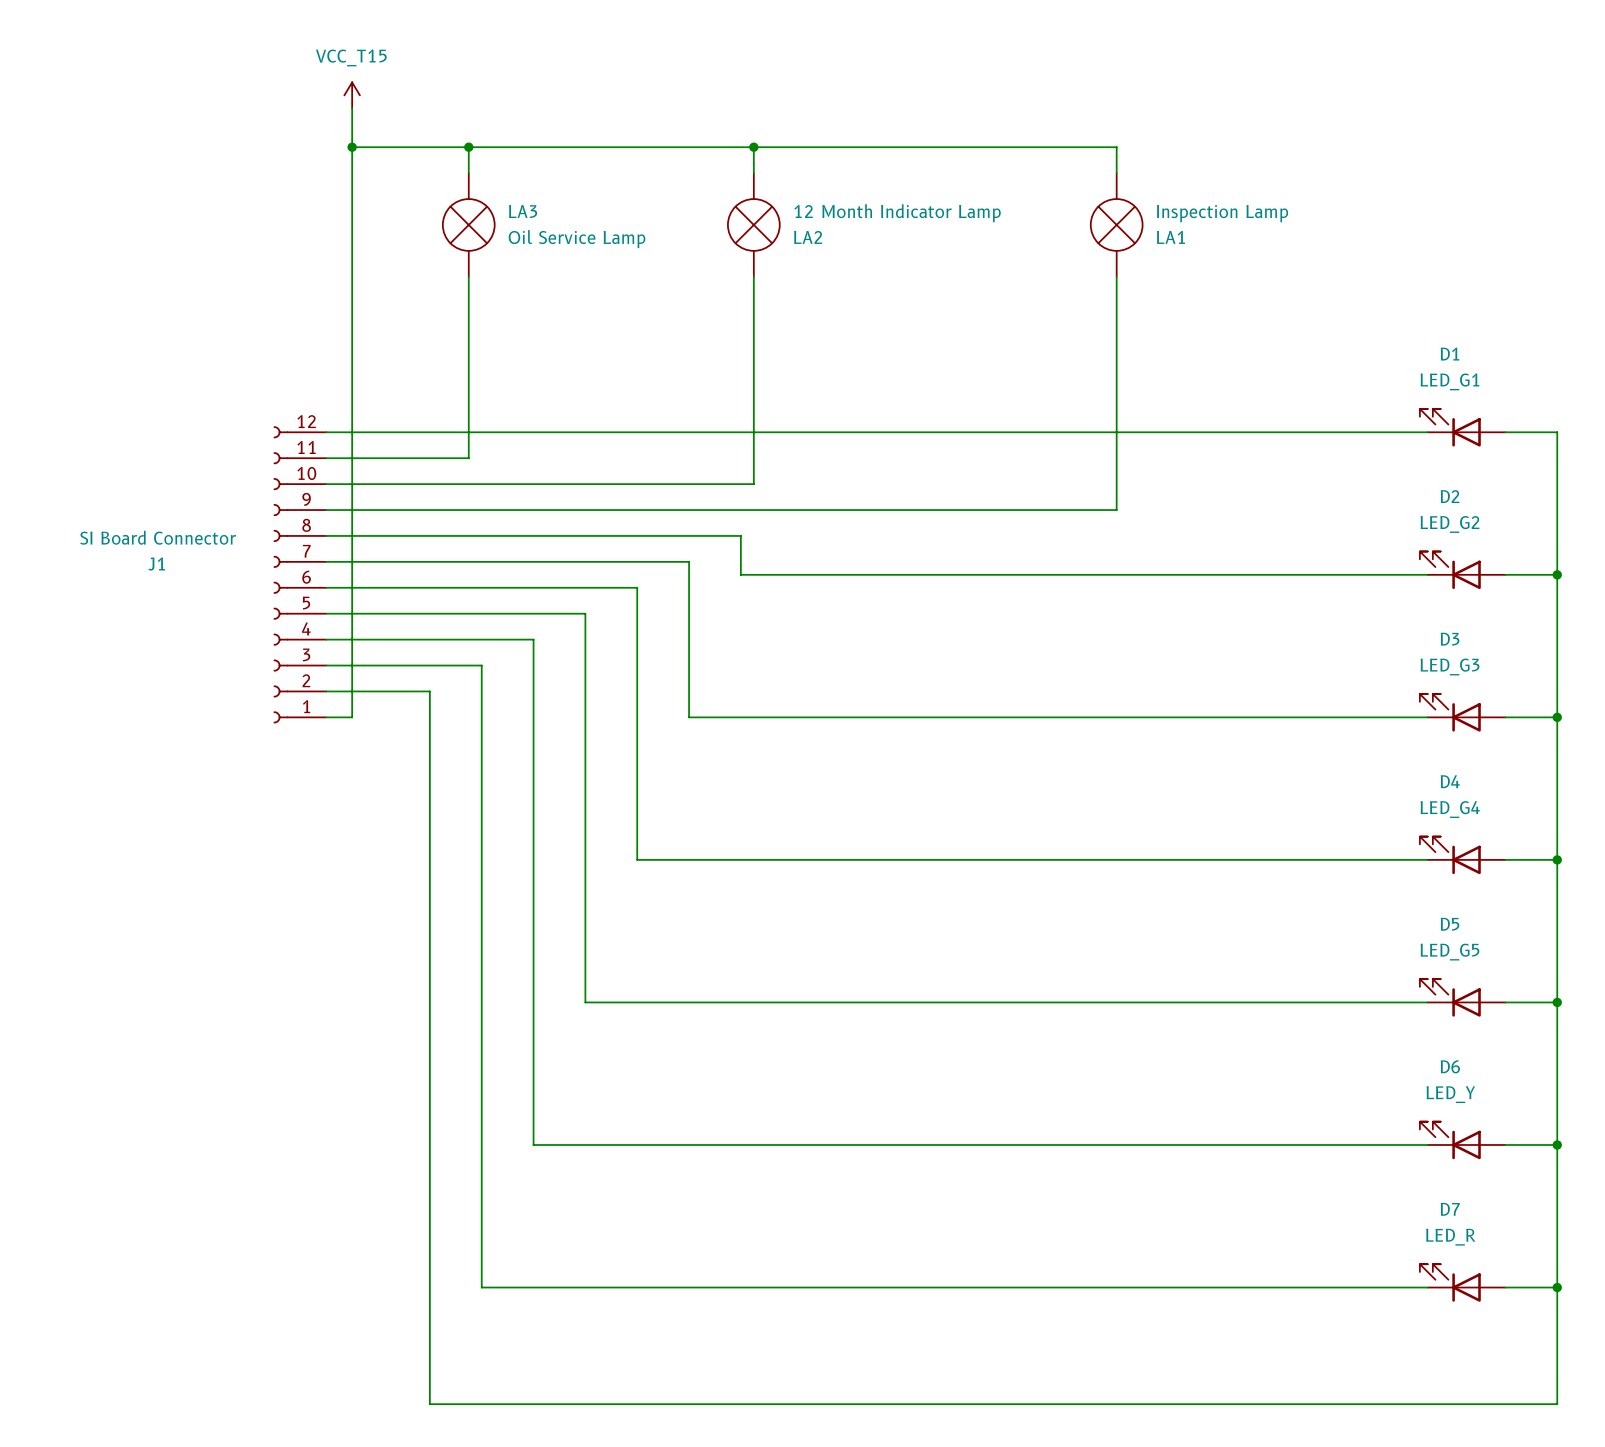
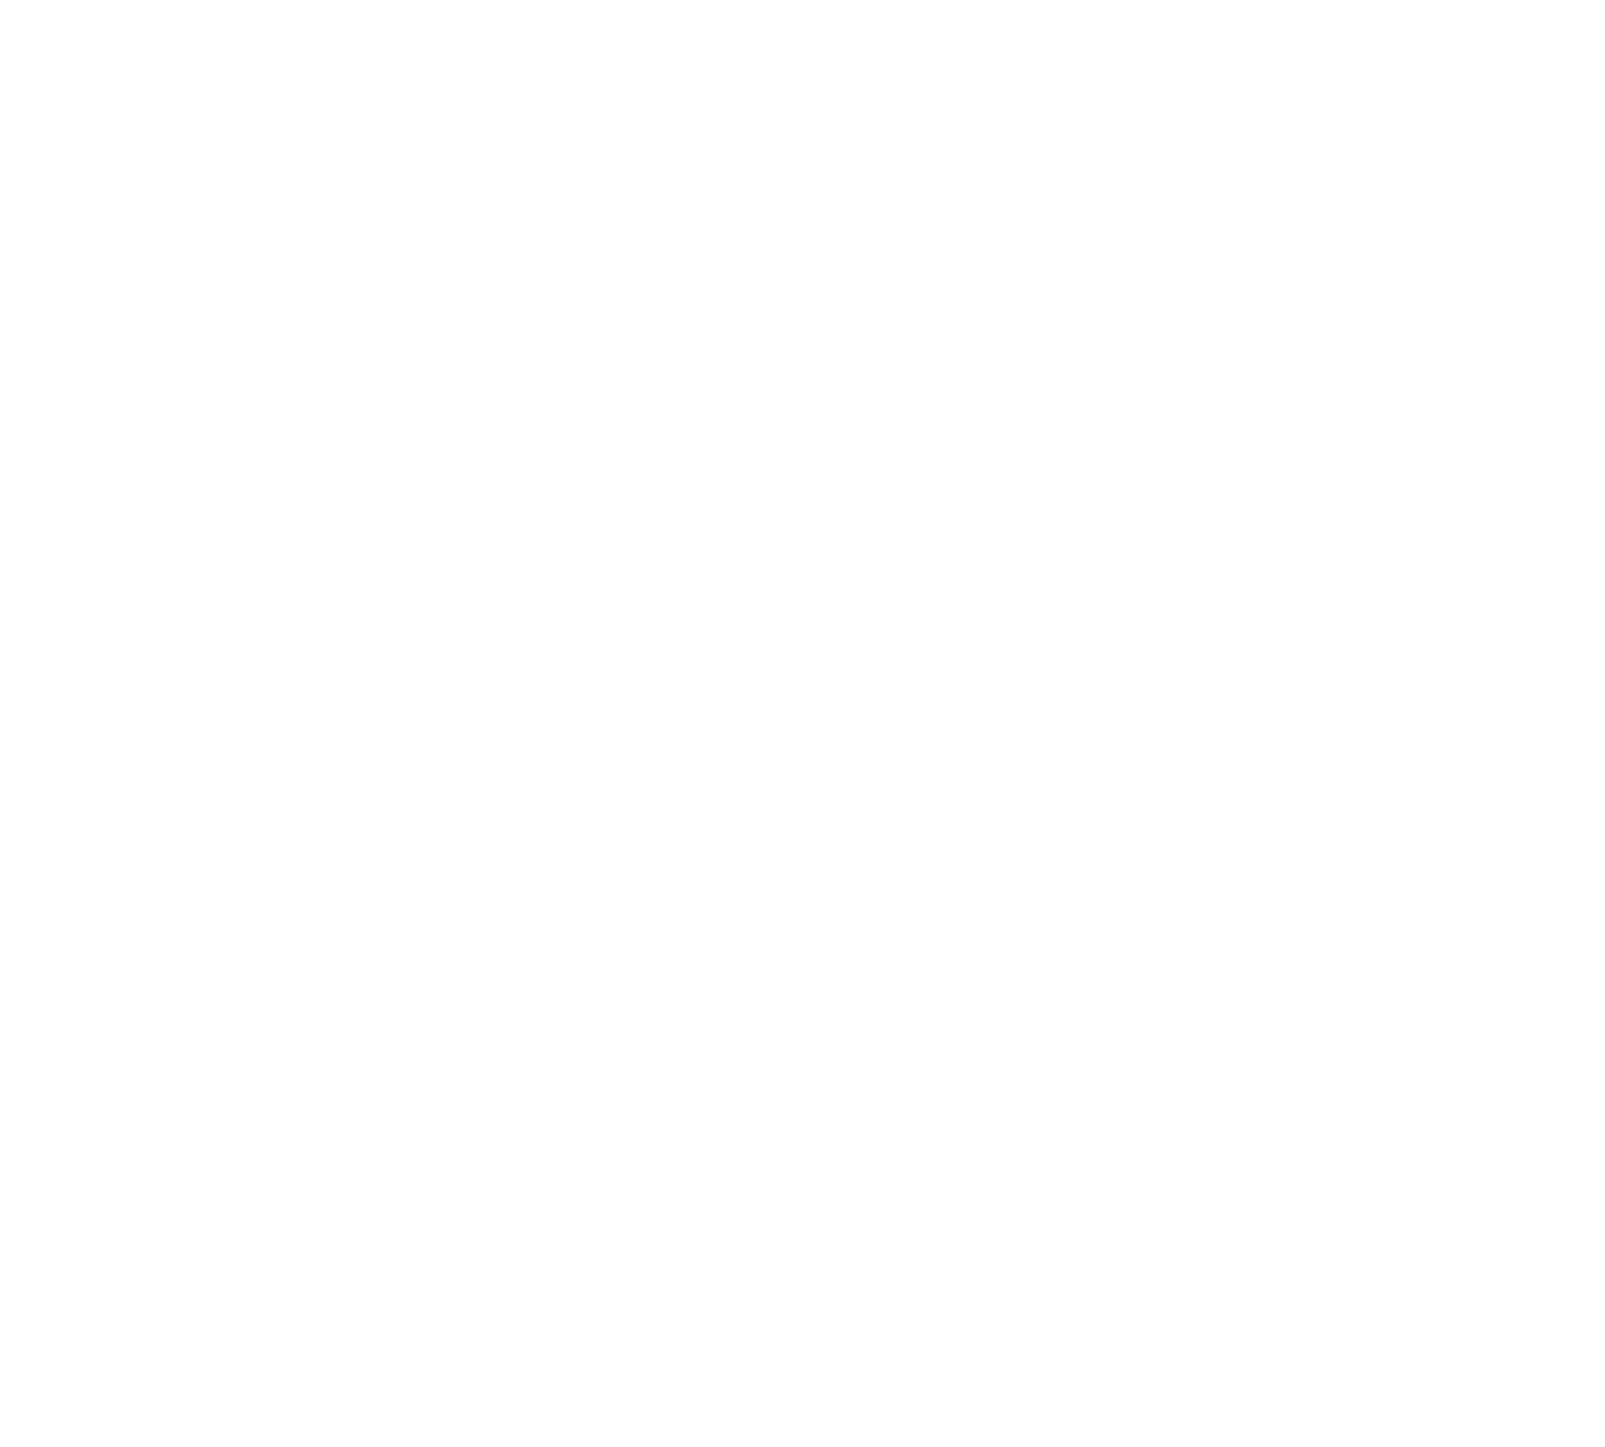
power symbol: VCC_T15 (352, 95) -> none
wire: (352, 108) (352, 717) (326, 717) -> none
wire: (352, 147) (1116, 147) (1116, 173) -> none
junction: (352, 147) -> none
wire: (468, 147) (468, 173) -> none
junction: (468, 147) -> none
wire: (753, 147) (753, 173) -> none
junction: (753, 147) -> none
LA3: Oil Service Lamp (468, 224) -> none
LA2: 12 Month Indicator Lamp (753, 224) -> none
LA1: Inspection Lamp (1116, 224) -> none
wire: (468, 276) (468, 458) (326, 458) -> none
wire: (753, 276) (753, 484) (326, 484) -> none
wire: (1116, 276) (1116, 510) (326, 510) -> none
D1: LED_G1 (1462, 427) -> none
wire: (326, 432) (1427, 432) -> none
wire: (1505, 432) (1557, 432) (1557, 1404) (429, 1404) (429, 691) (326, 691) -> none
wire: (326, 535) (740, 535) (740, 574) (1427, 574) -> none
wire: (326, 561) (689, 561) (689, 717) (1427, 717) -> none
D2: LED_G2 (1462, 570) -> none
J1: SI Board Connector (299, 574) -> none
wire: (1505, 574) (1557, 574) -> none
junction: (1557, 574) -> none
wire: (326, 587) (637, 587) (637, 859) (1427, 859) -> none
wire: (326, 613) (585, 613) (585, 1002) (1427, 1002) -> none
wire: (326, 639) (533, 639) (533, 1144) (1427, 1144) -> none
wire: (326, 665) (481, 665) (481, 1287) (1427, 1287) -> none
D3: LED_G3 (1462, 712) -> none
wire: (1505, 717) (1557, 717) -> none
junction: (1557, 717) -> none
D4: LED_G4 (1462, 855) -> none
wire: (1505, 859) (1557, 859) -> none
junction: (1557, 859) -> none
D5: LED_G5 (1462, 997) -> none
wire: (1505, 1002) (1557, 1002) -> none
junction: (1557, 1002) -> none
D6: LED_Y (1462, 1140) -> none
wire: (1505, 1144) (1557, 1144) -> none
junction: (1557, 1144) -> none
D7: LED_R (1462, 1282) -> none
wire: (1505, 1287) (1557, 1287) -> none
junction: (1557, 1287) -> none

